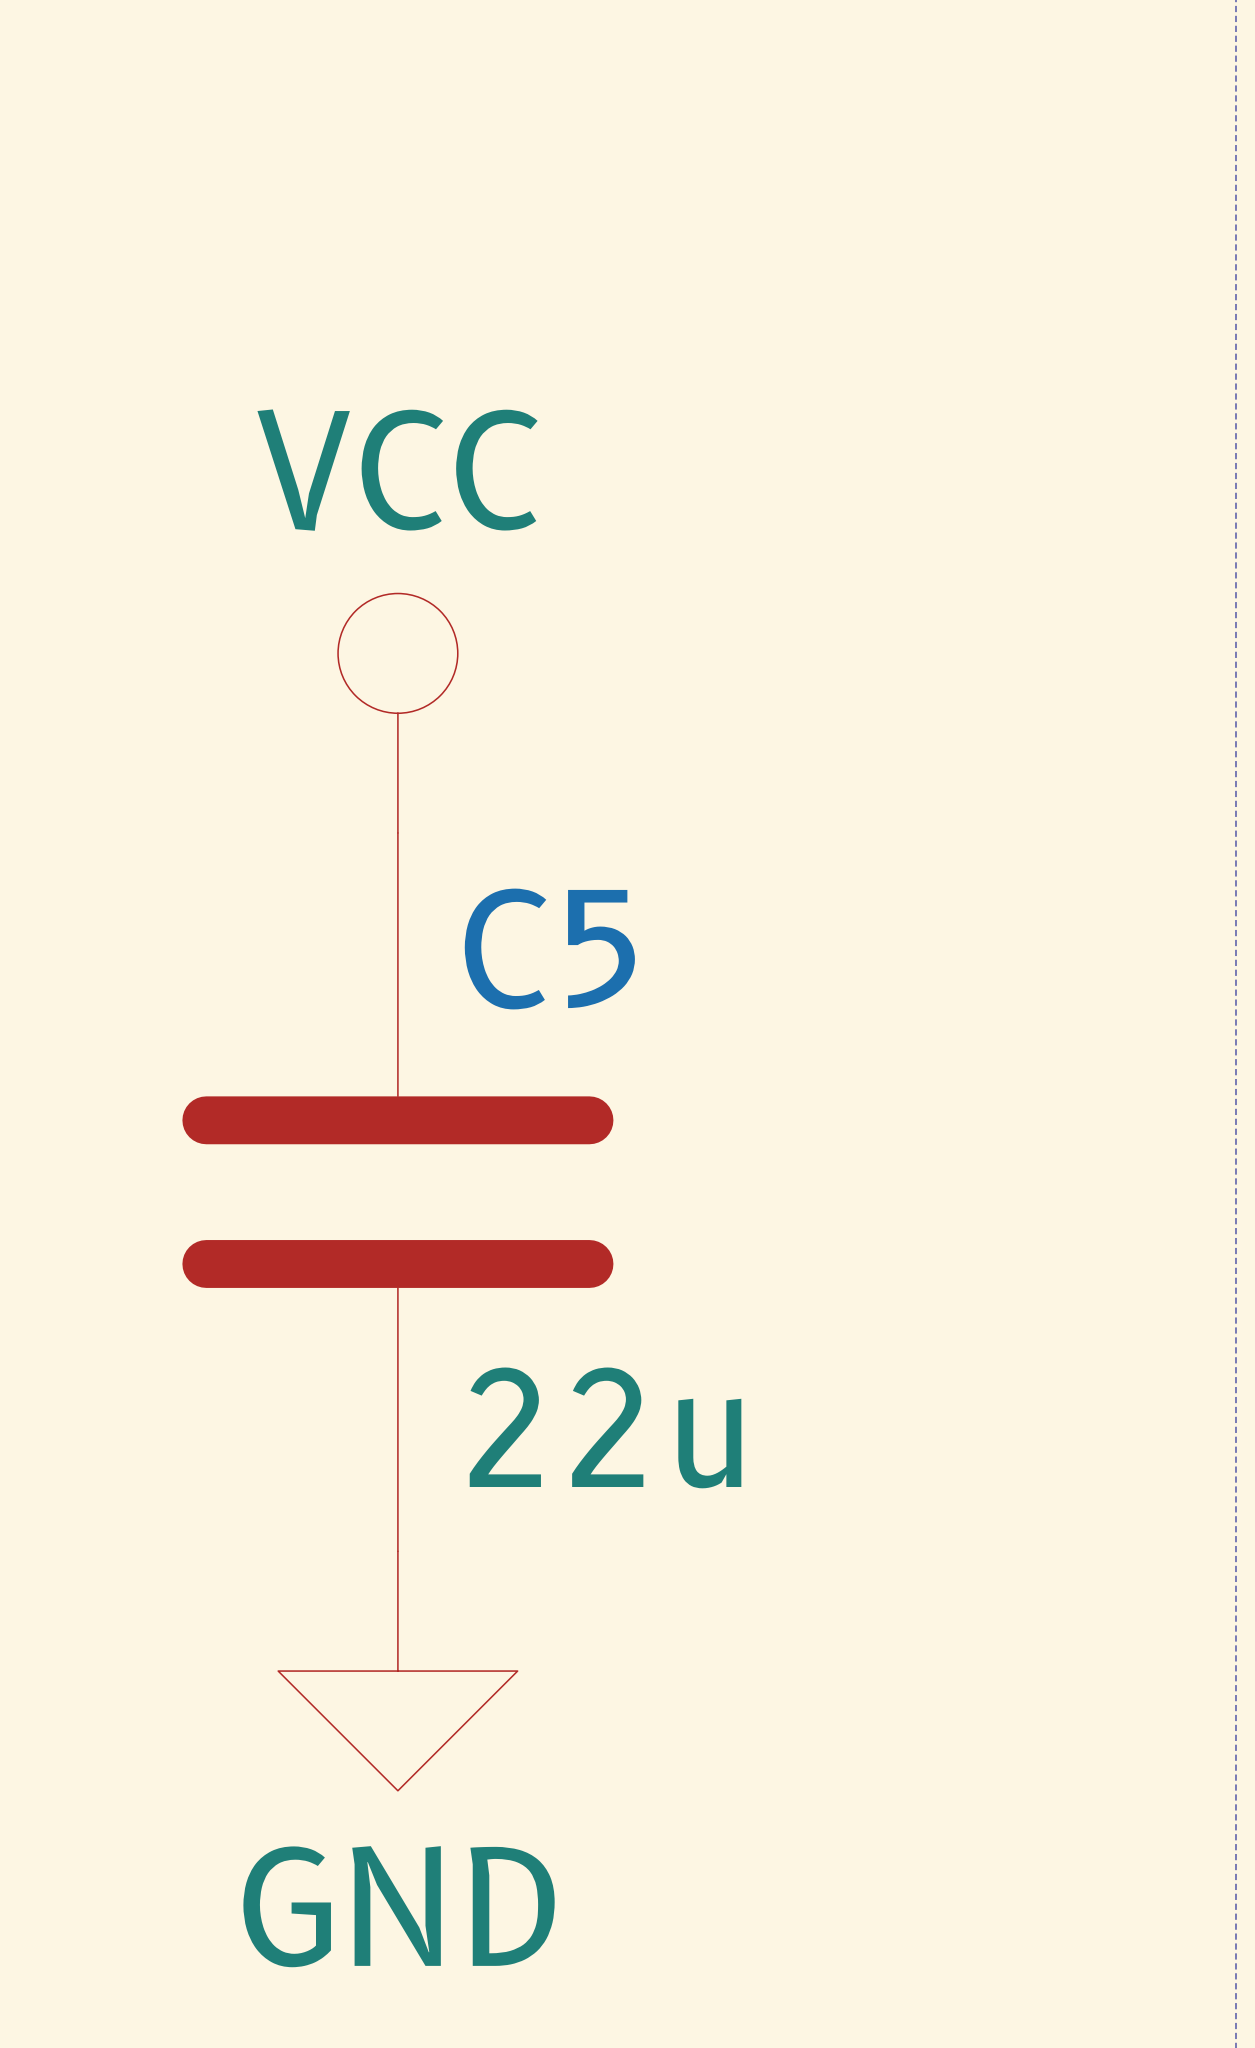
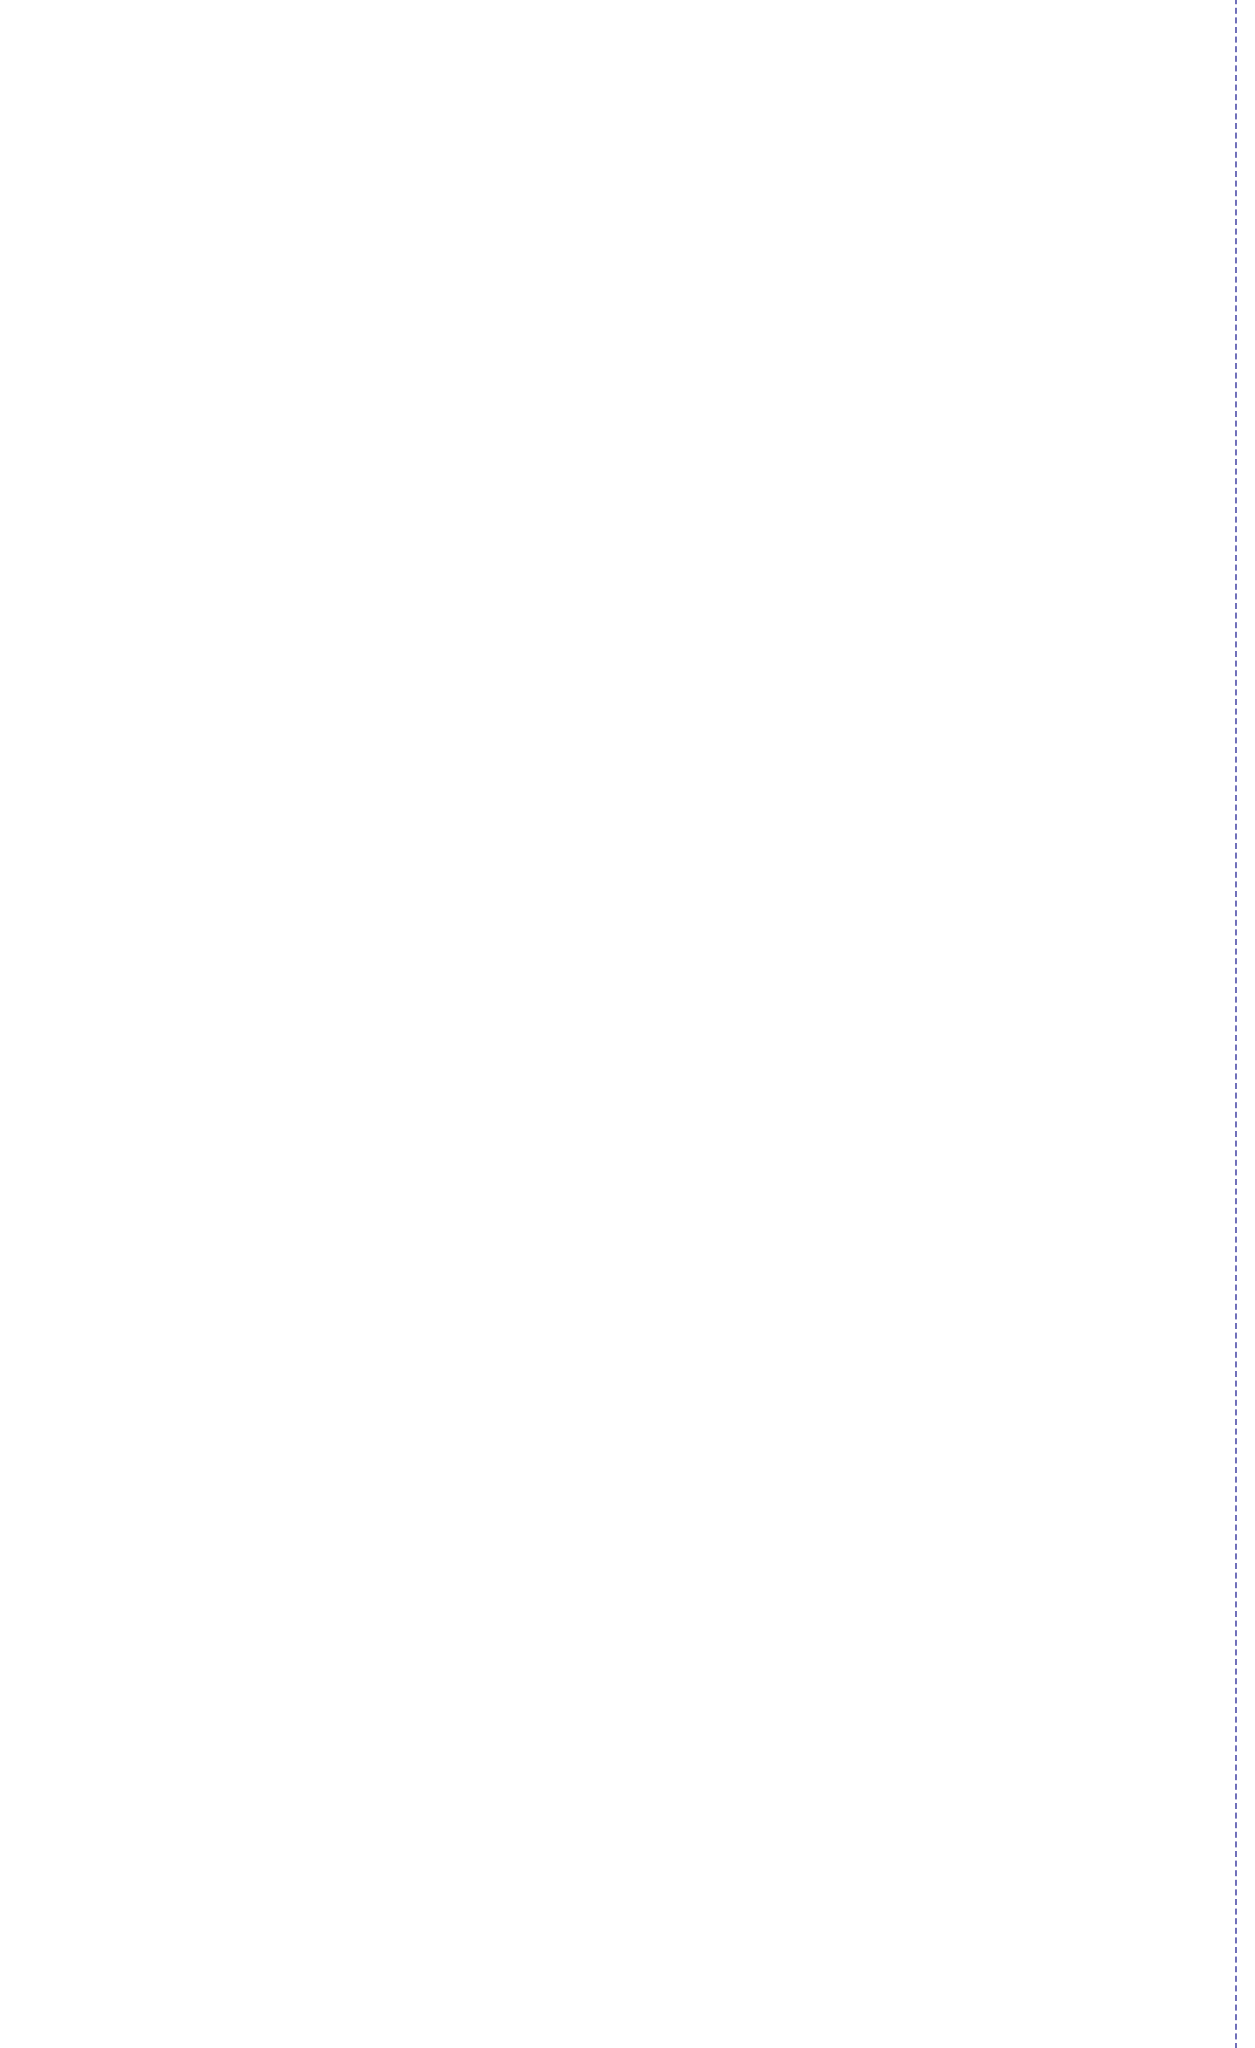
power symbol: VCC (397, 713) -> none
C5: 22u (397, 1192) -> none
power symbol: GND (397, 1671) -> none

